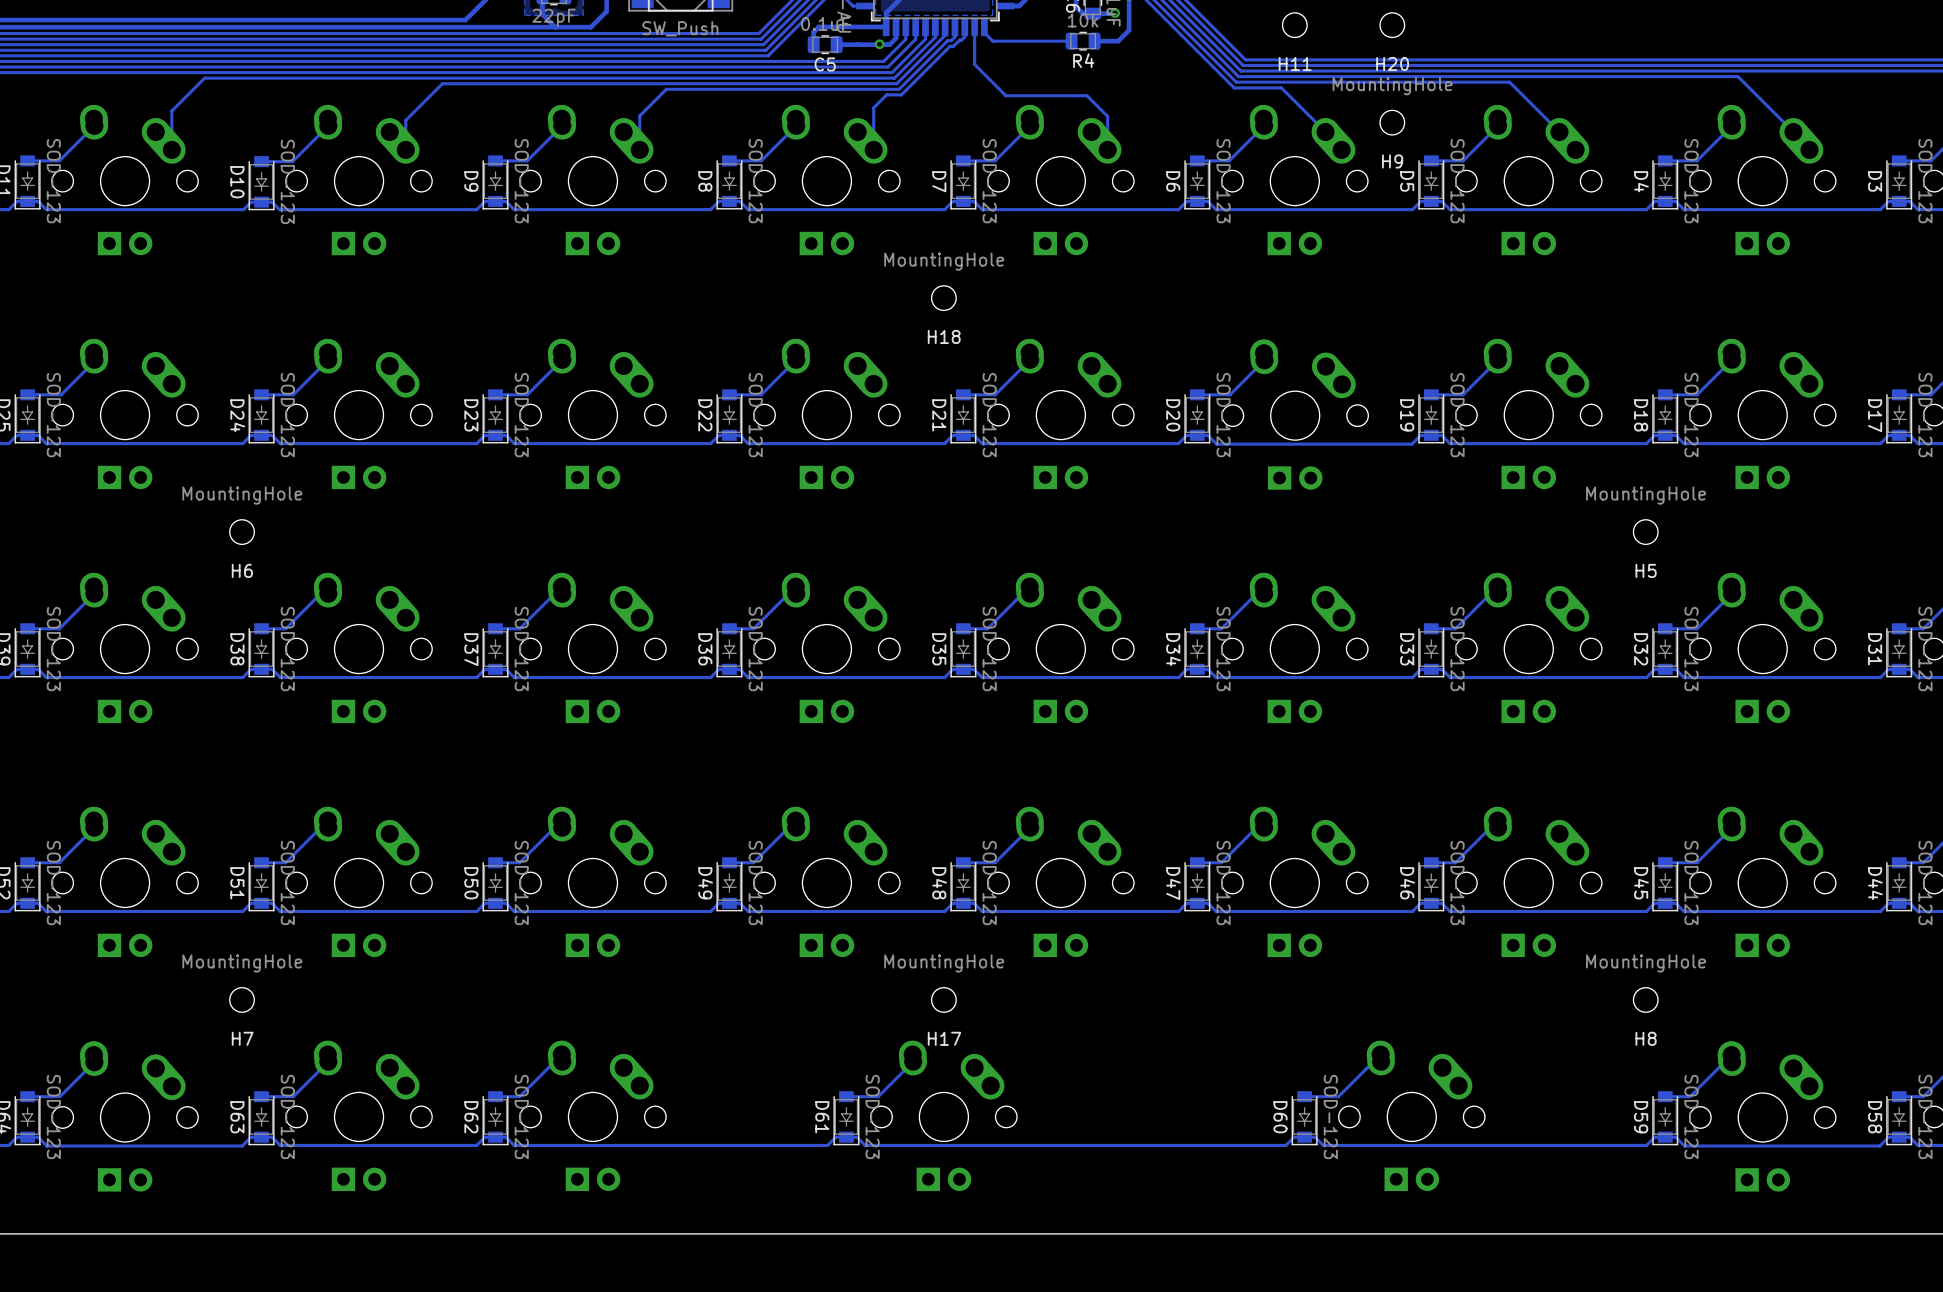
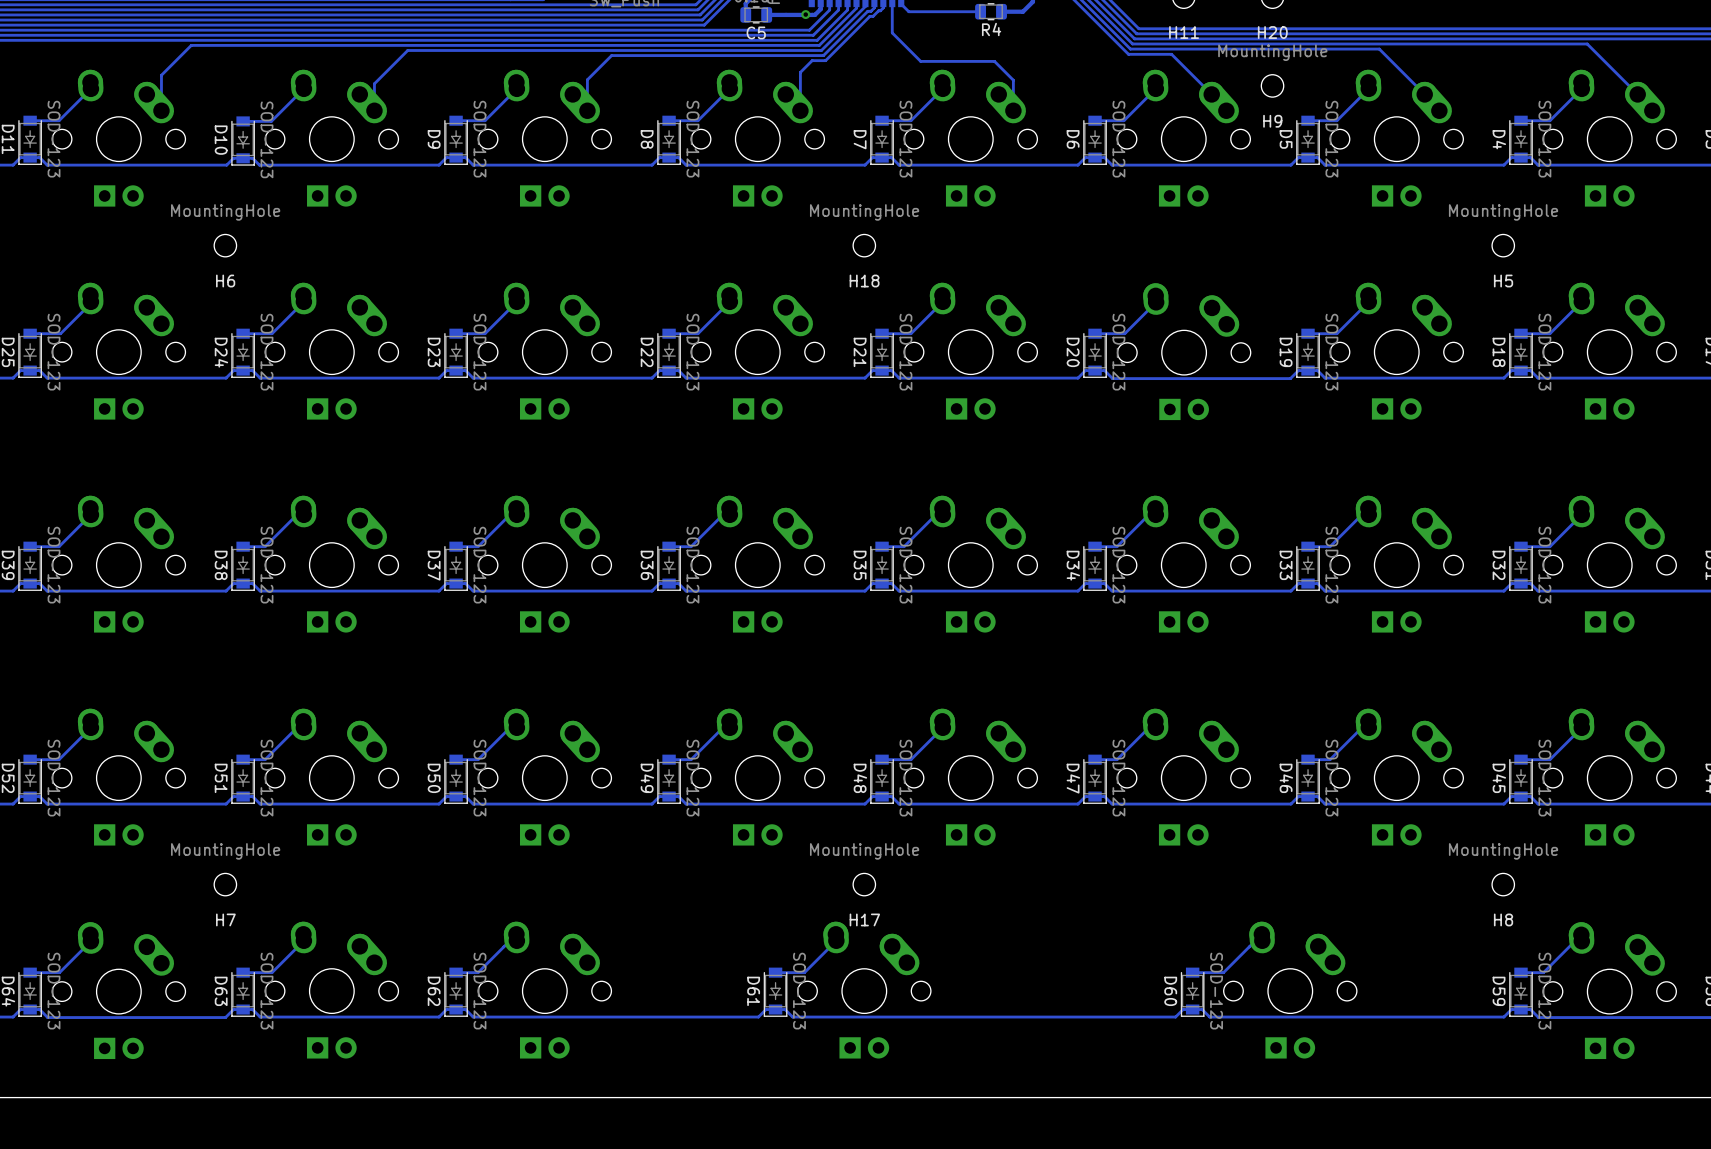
H6 position: (242, 532) -> (225, 245)
H5 position: (1645, 532) -> (1503, 245)

